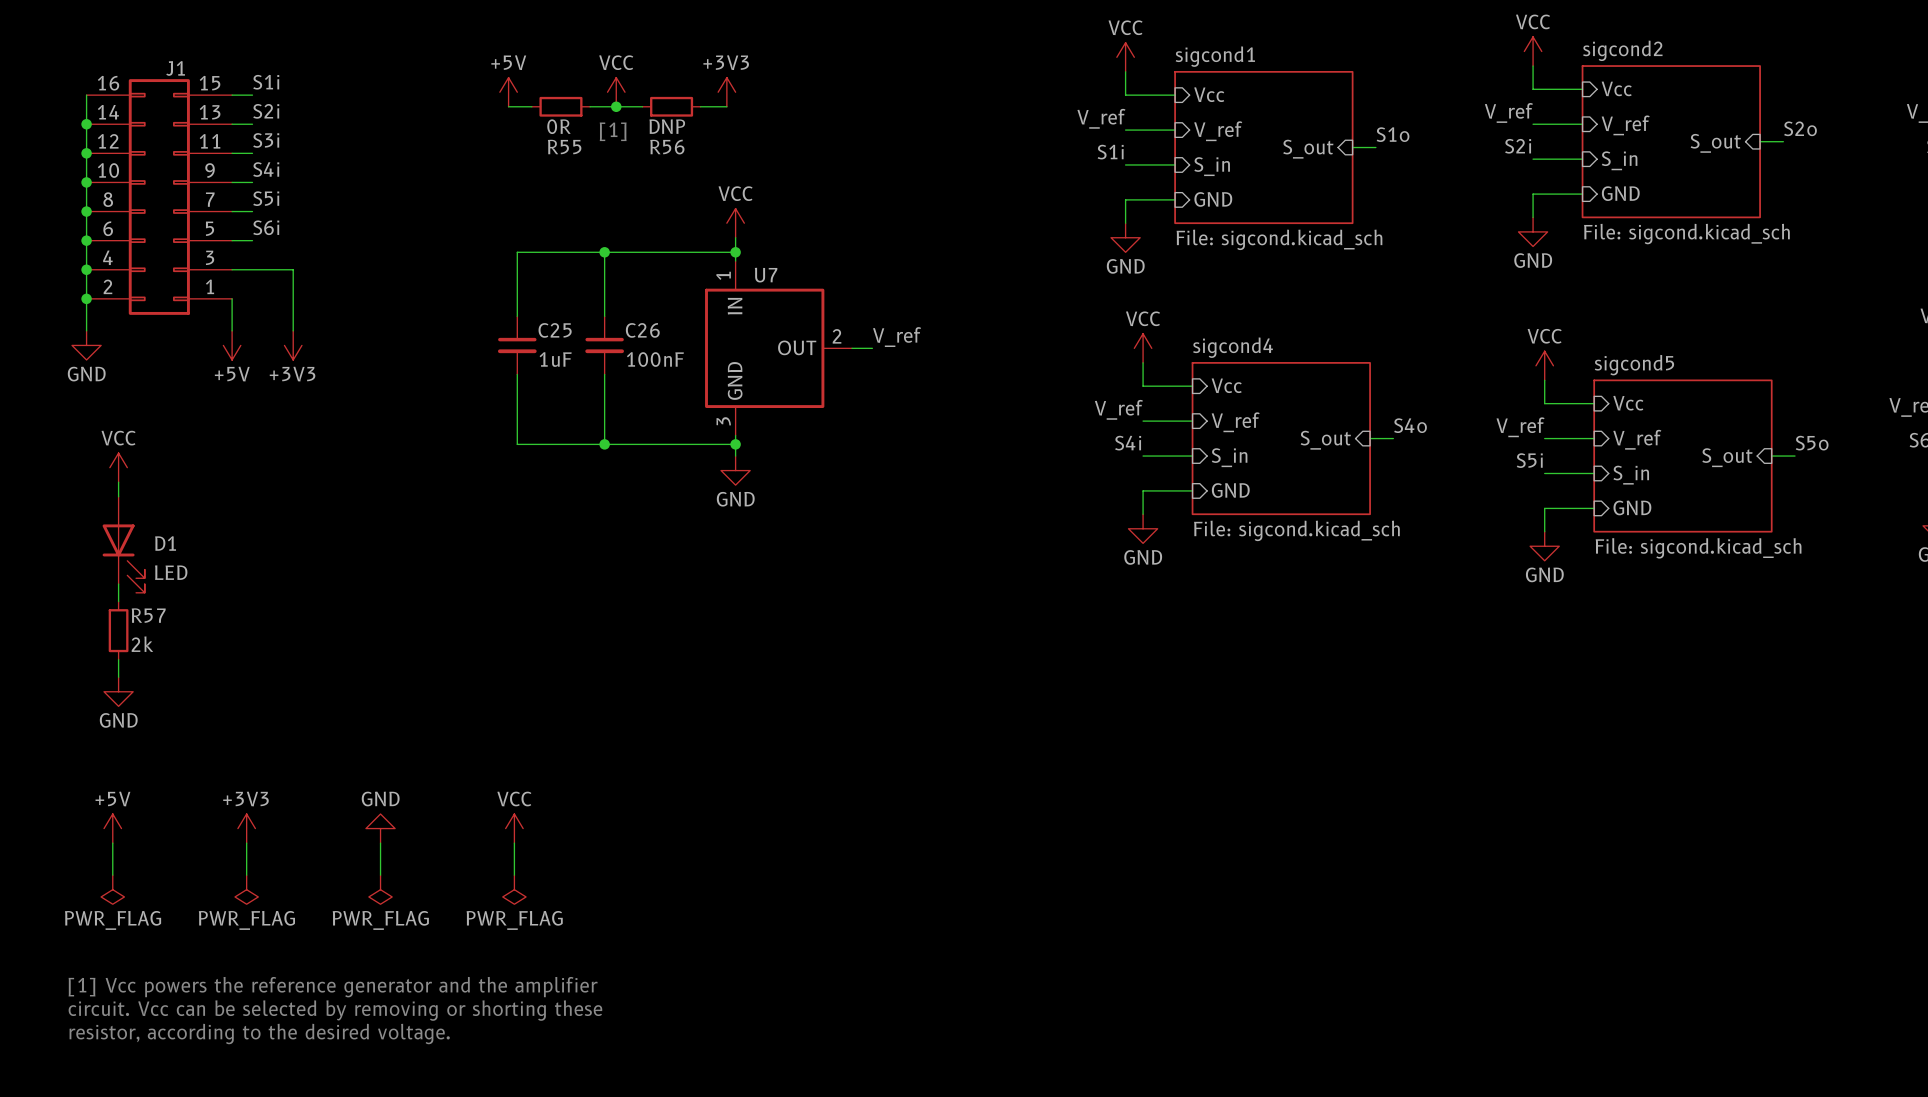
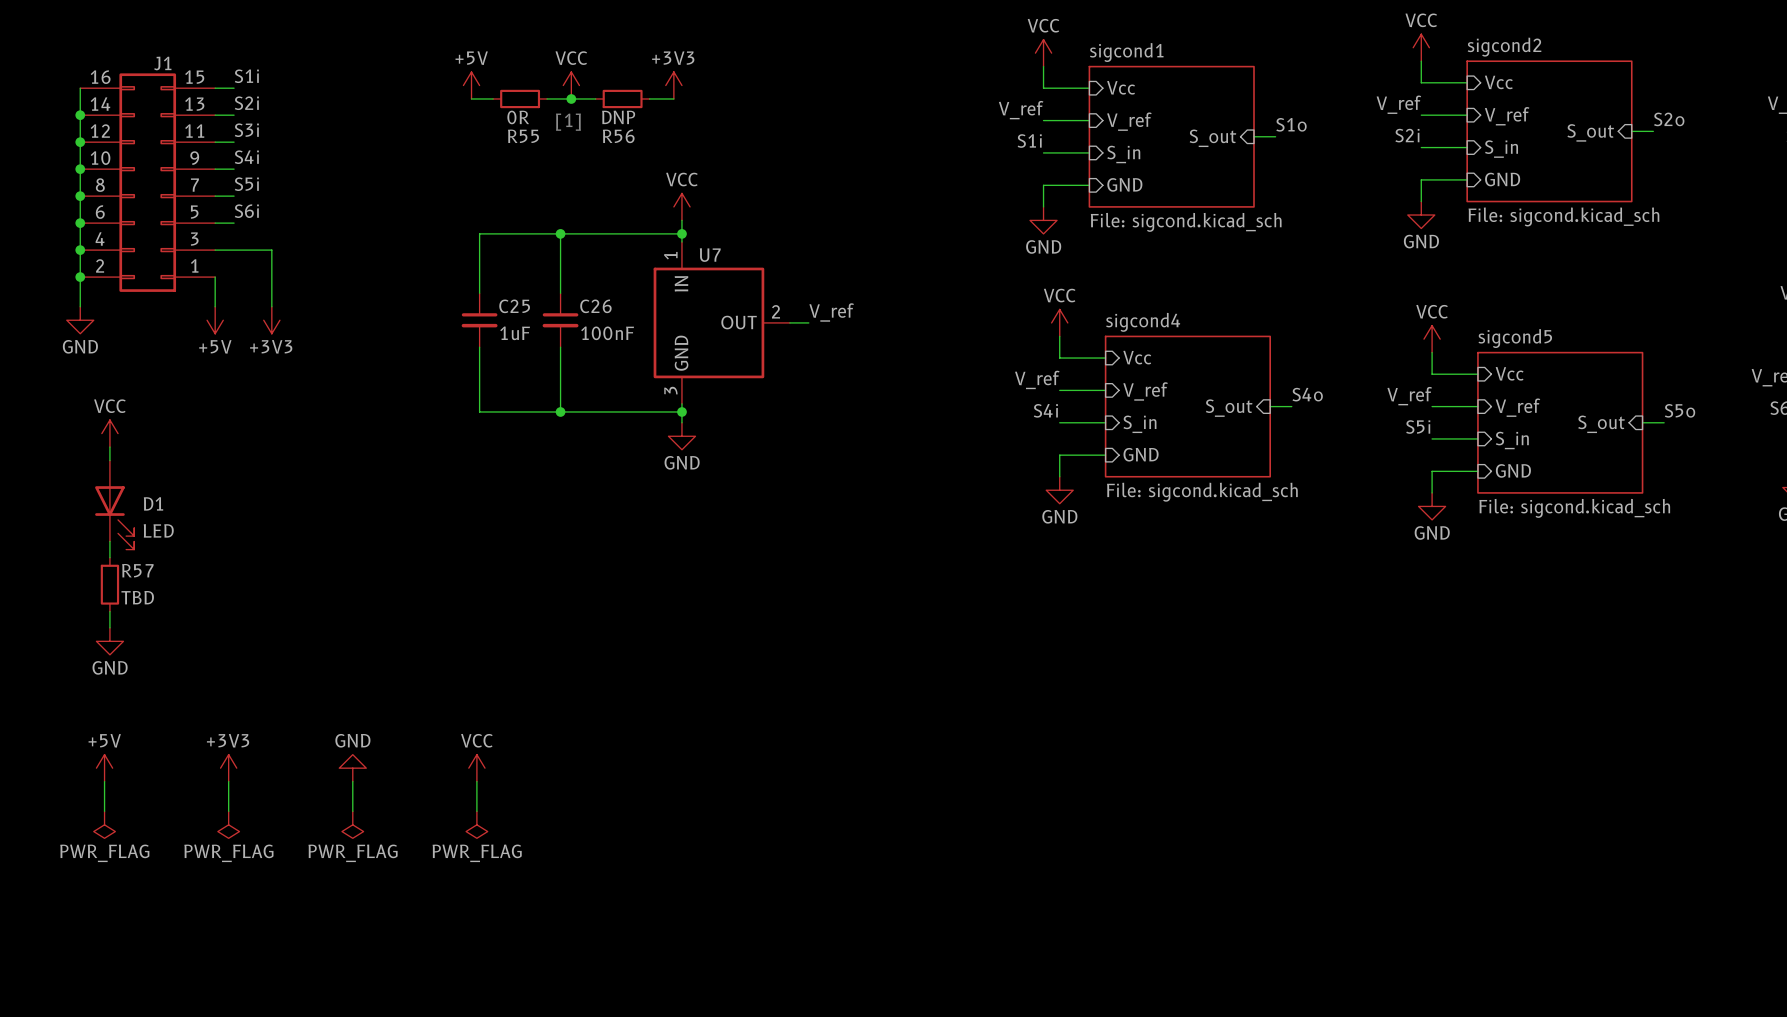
R57 value: 2k (142, 644) -> TBD (137, 597)
text: [1] Vcc powers the reference generator and the amplifier (333, 987) -> none
text: circuit. Vcc can be selected by removing or shorting these (335, 1010) -> none
text: resistor, according to the desired voltage. (259, 1034) -> none

